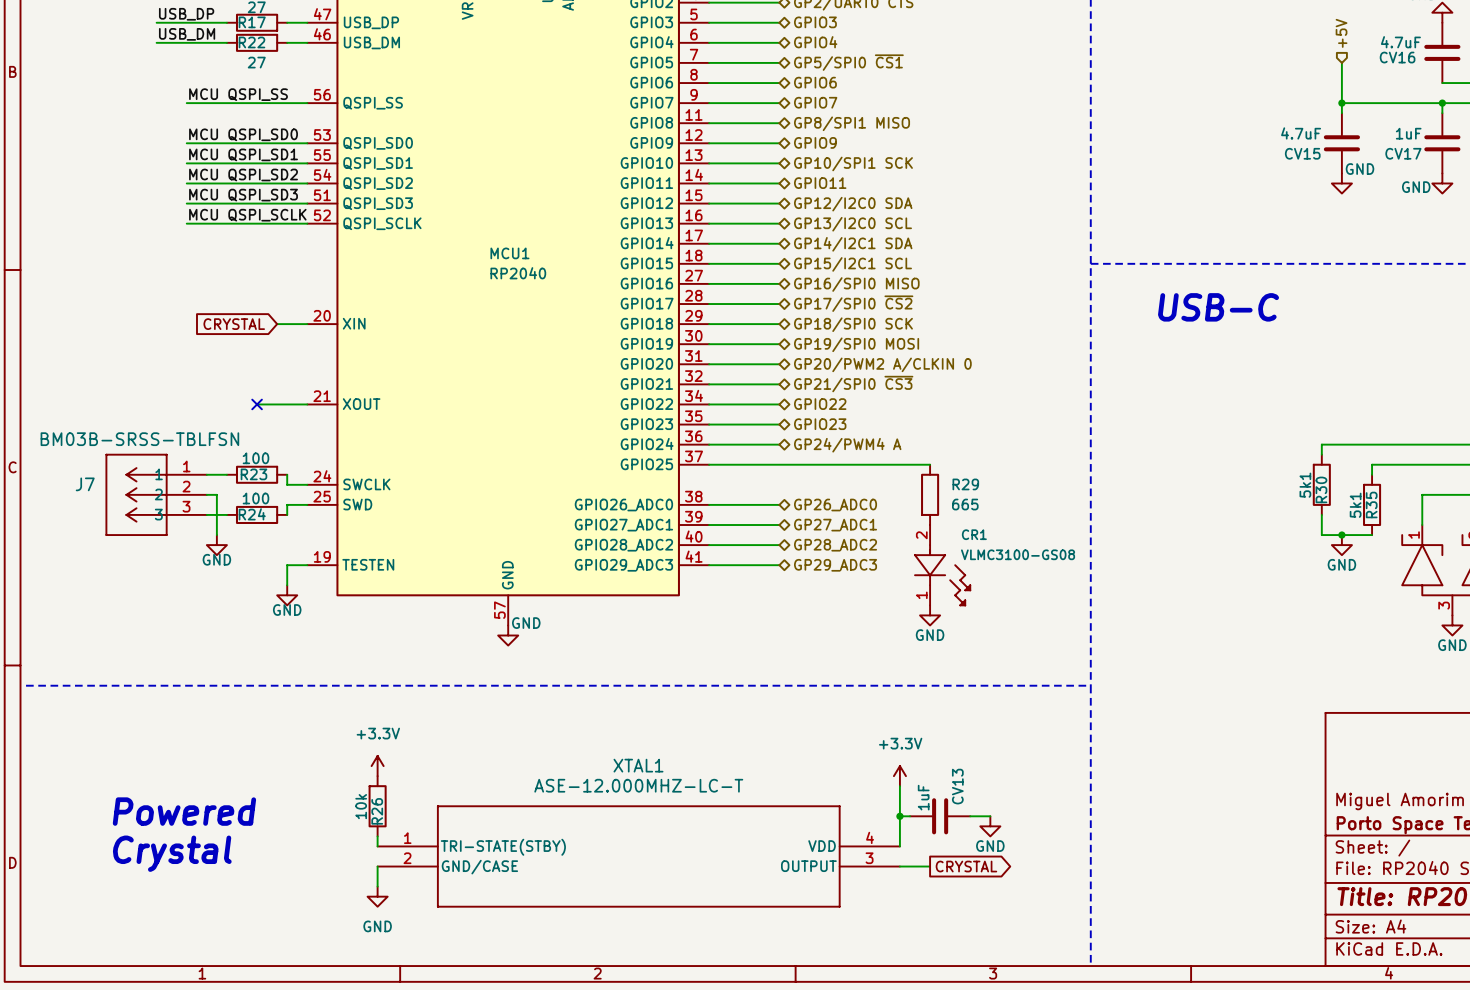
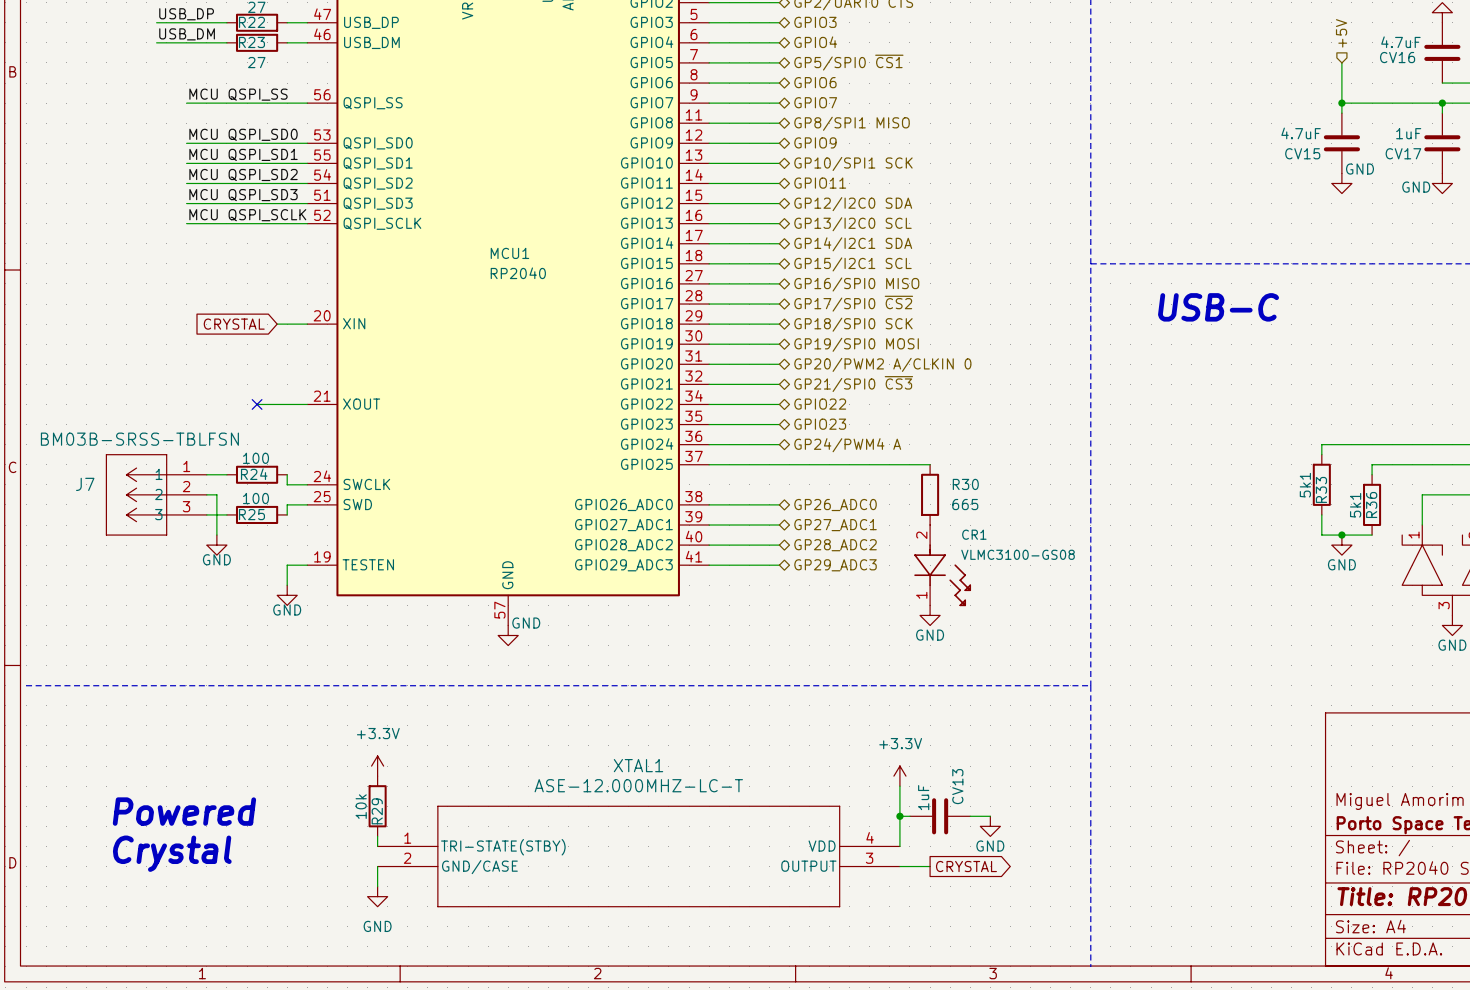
R17 name: R17 (252, 22) -> R22 (251, 22)
R22 name: R22 (251, 42) -> R23 (251, 42)
R23 name: R23 (253, 474) -> R24 (254, 474)
R29 name: R29 (965, 484) -> R30 (965, 484)
R30 name: R30 (1321, 489) -> R33 (1321, 489)
R35 name: R35 (1371, 504) -> R36 (1371, 504)
R24 name: R24 (252, 514) -> R25 (251, 514)
R26 name: R26 (377, 811) -> R29 (377, 811)

